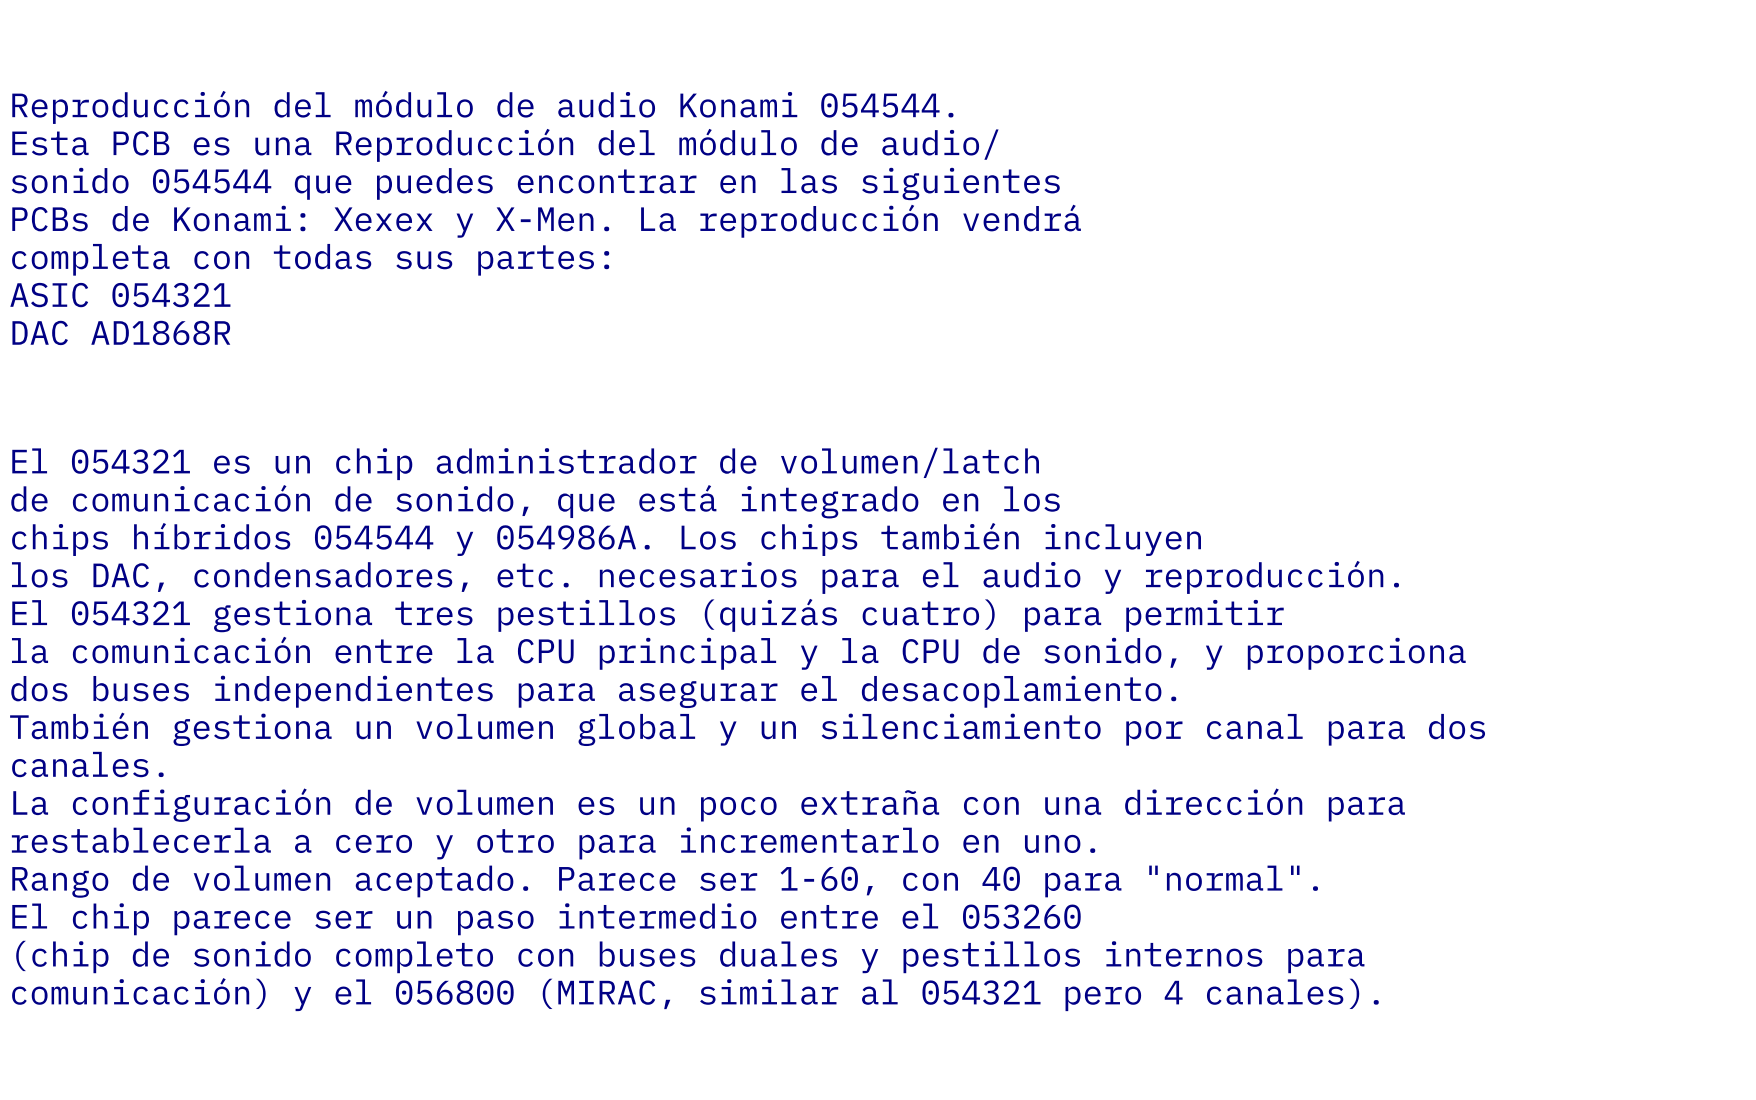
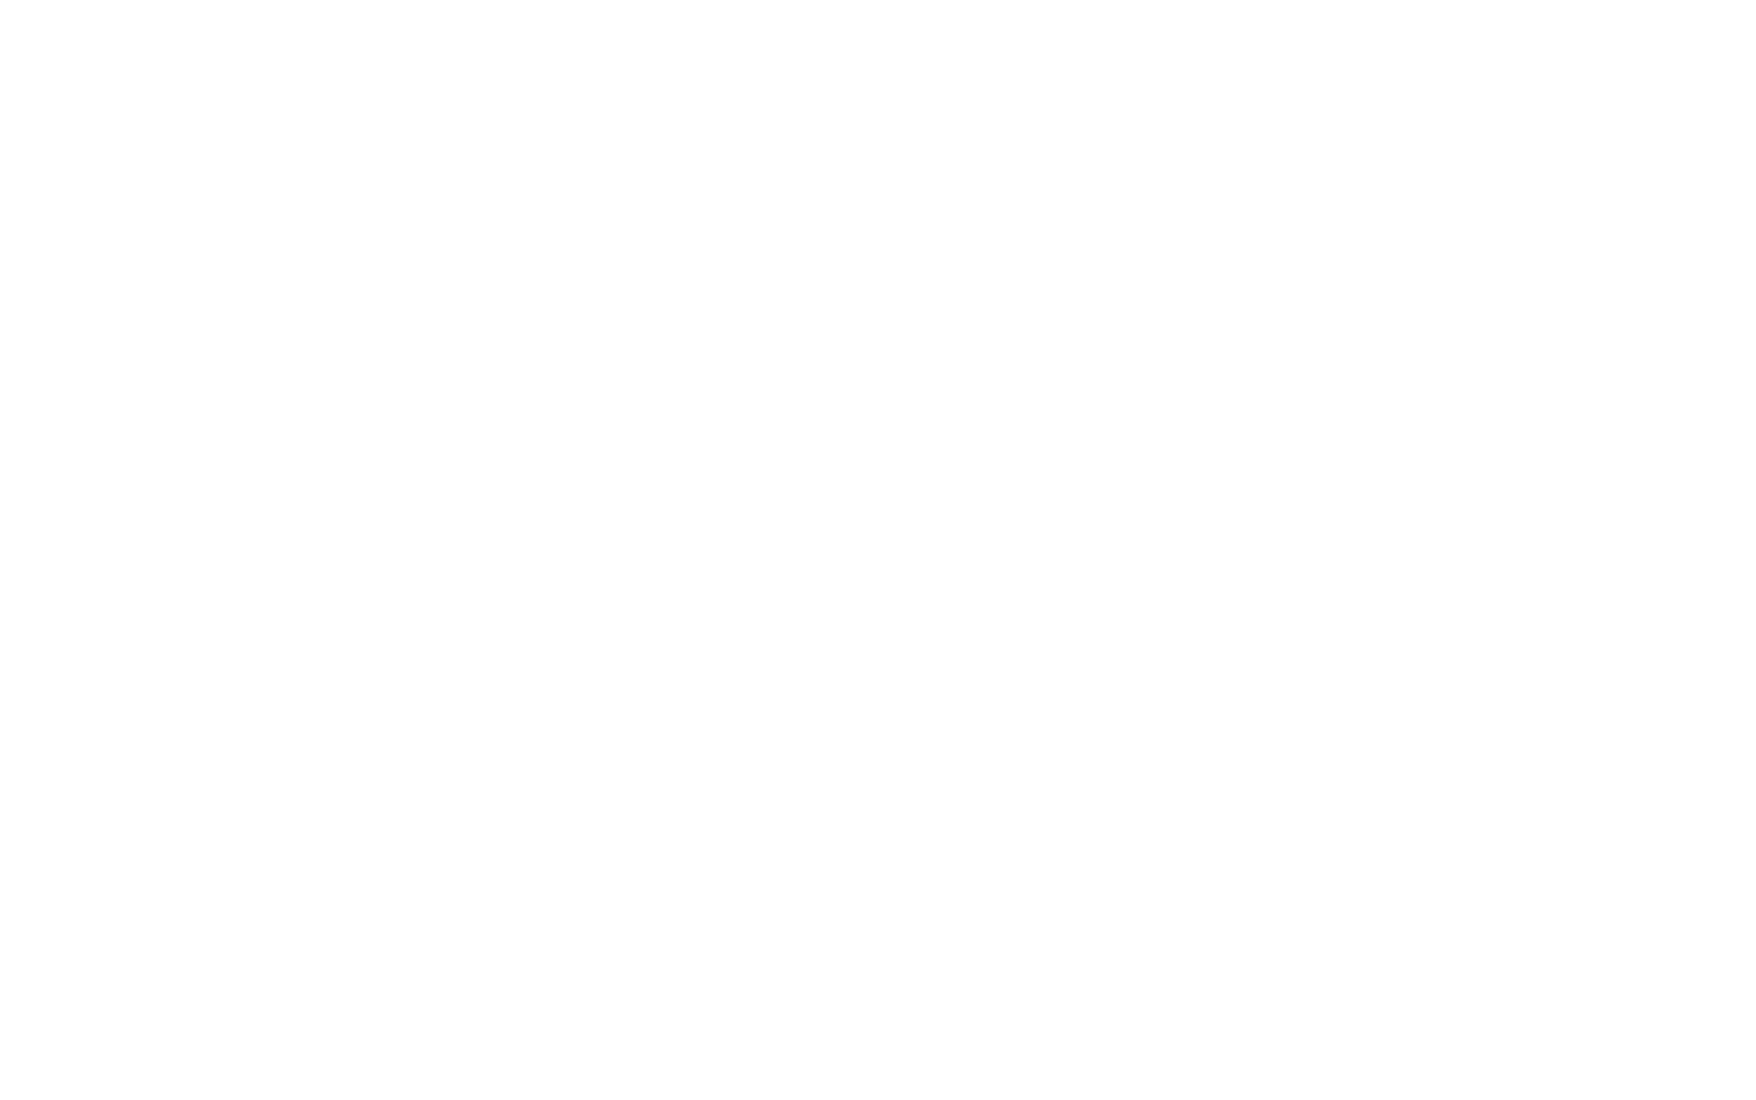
text: Reproducción del módulo de audio Konami 054544. (482, 107) -> none
text: Esta PCB es una Reproducción del módulo de audio/ (505, 145) -> none
text: sonido 054544 que puedes encontrar en las siguientes (535, 183) -> none
text: PCBs de Konami: Xexex y X-Men. La reproducción vendrá (546, 221) -> none
text: completa con todas sus partes: (310, 259) -> none
text: ASIC 054321 (120, 295) -> none
text: DAC AD1868R (121, 332) -> none
text: El 054321 es un chip administrador de volumen/latch (525, 463) -> none
text: de comunicación de sonido, que está integrado en los (535, 501) -> none
text: chips híbridos 054544 y 054986A. Los chips también incluyen (606, 539) -> none
text: los DAC, condensadores, etc. necesarios para el audio y reproducción. (705, 577) -> none
text: El 054321 gestiona tres pestillos (quizás cuatro) para permitir (648, 615) -> none
text: la comunicación entre la CPU principal y la CPU de sonido, y proporciona (738, 653) -> none
text: dos buses independientes para asegurar el desacoplamiento. (593, 691) -> none
text: También gestiona un volumen global y un silenciamiento por canal para dos (747, 729) -> none
text: canales. (87, 764) -> none
text: La configuración de volumen es un poco extraña con una dirección para (709, 805) -> none
text: restablecerla a cero y otro para incrementarlo en uno. (553, 843) -> none
text: Rango de volumen aceptado. Parece ser 1-60, con 40 para "normal". (665, 881) -> none
text: El chip parece ser un paso intermedio entre el 053260 (546, 919) -> none
text: (chip de sonido completo con buses duales y pestillos internos para (690, 956) -> none
text: comunicación) y el 056800 (MIRAC, similar al 054321 pero 4 canales). (695, 994) -> none

